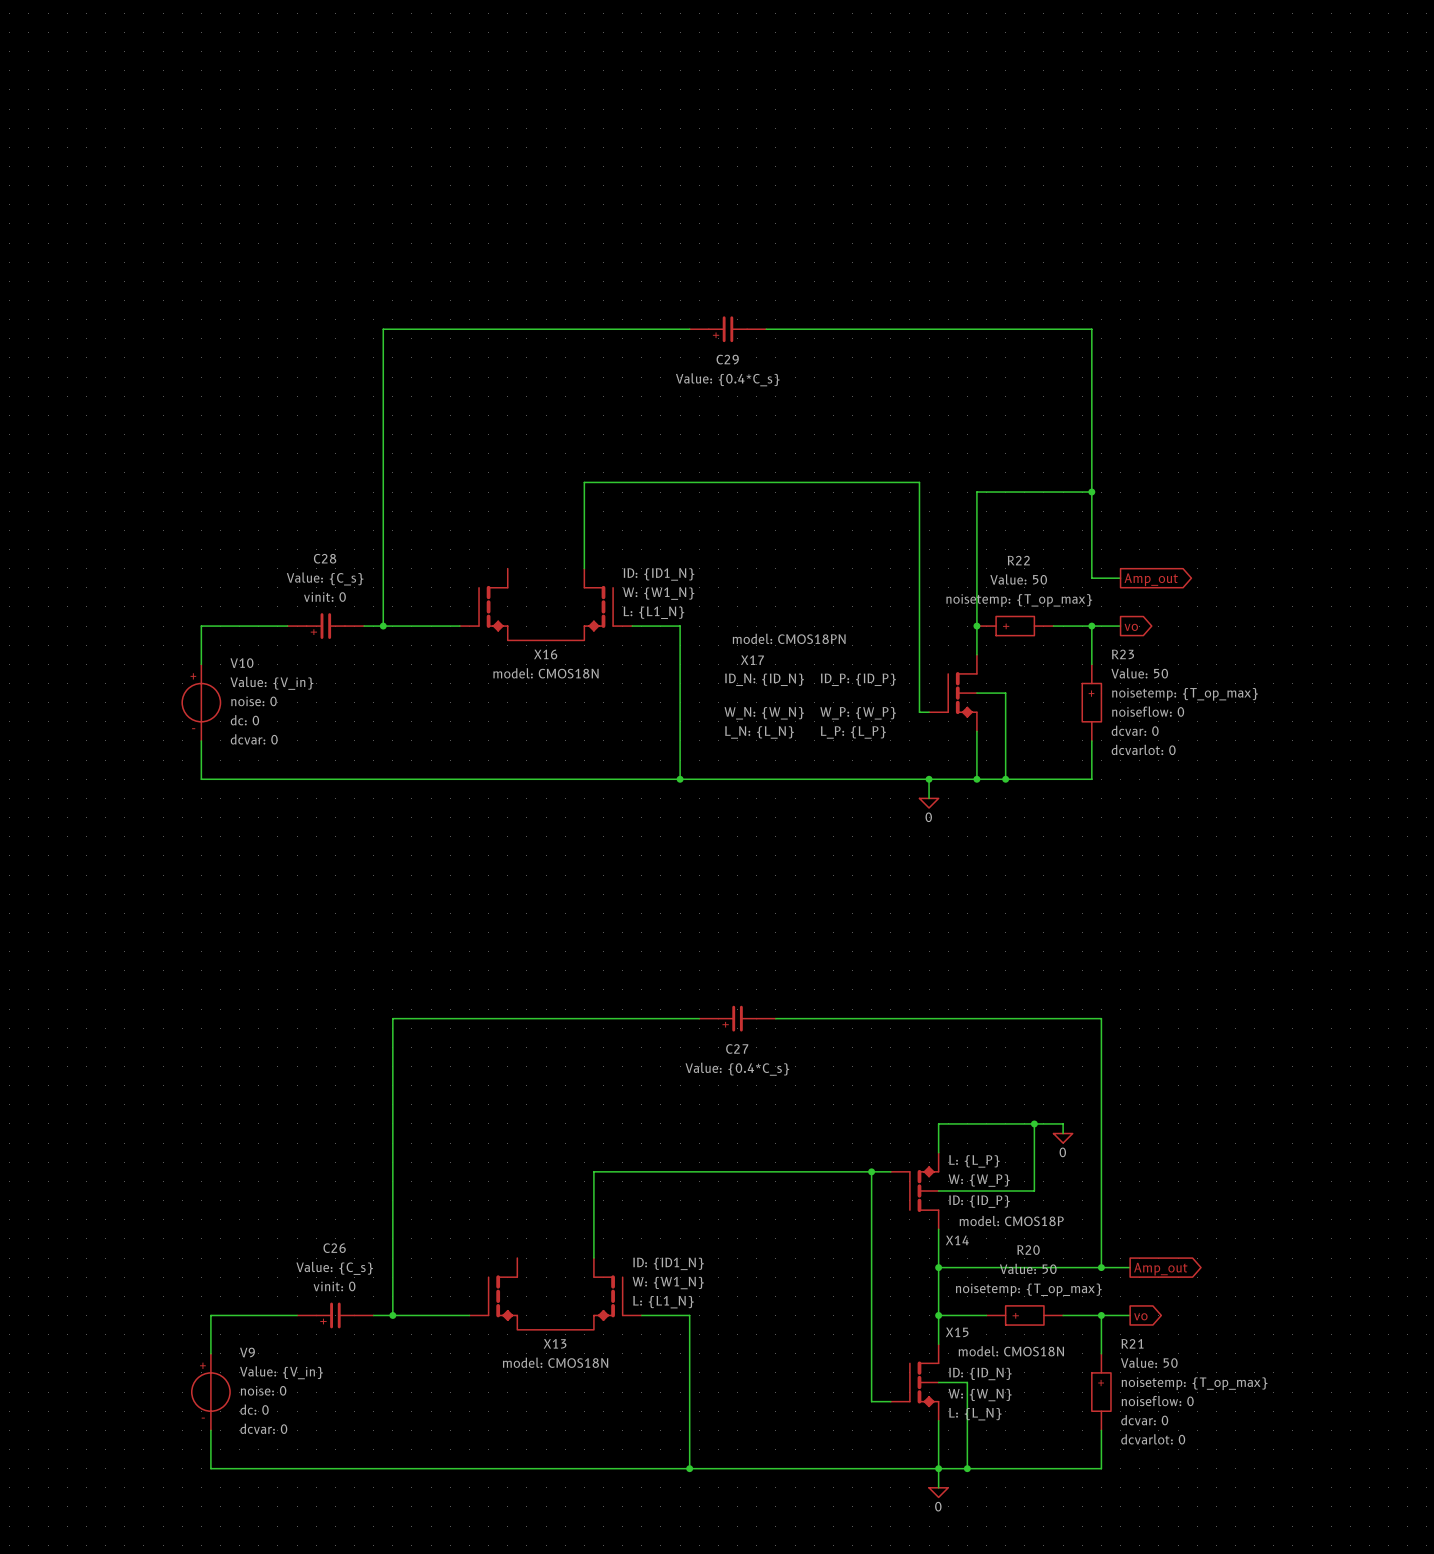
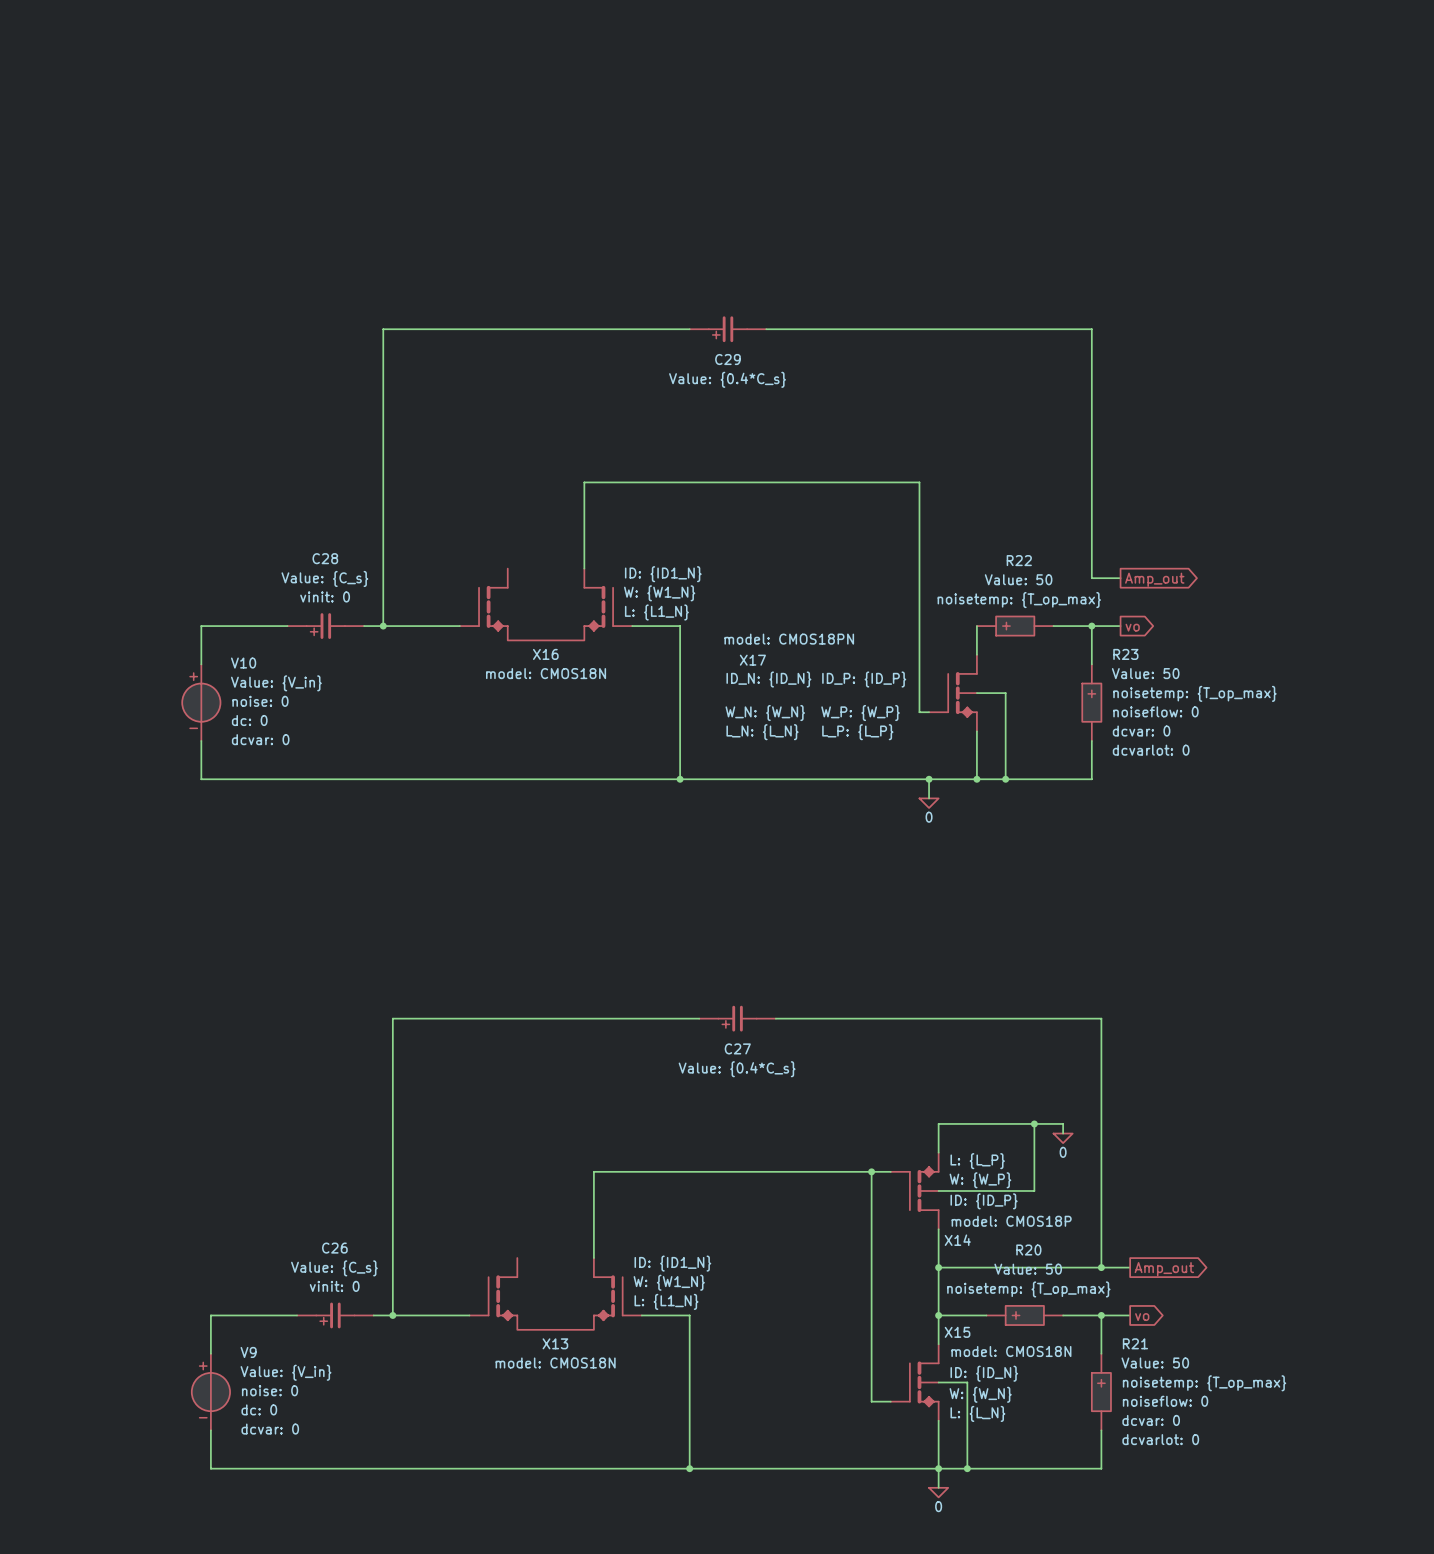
wire: (1091, 492) (976, 492) (976, 626) -> none
junction: (1091, 492) -> none
junction: (976, 626) -> none

